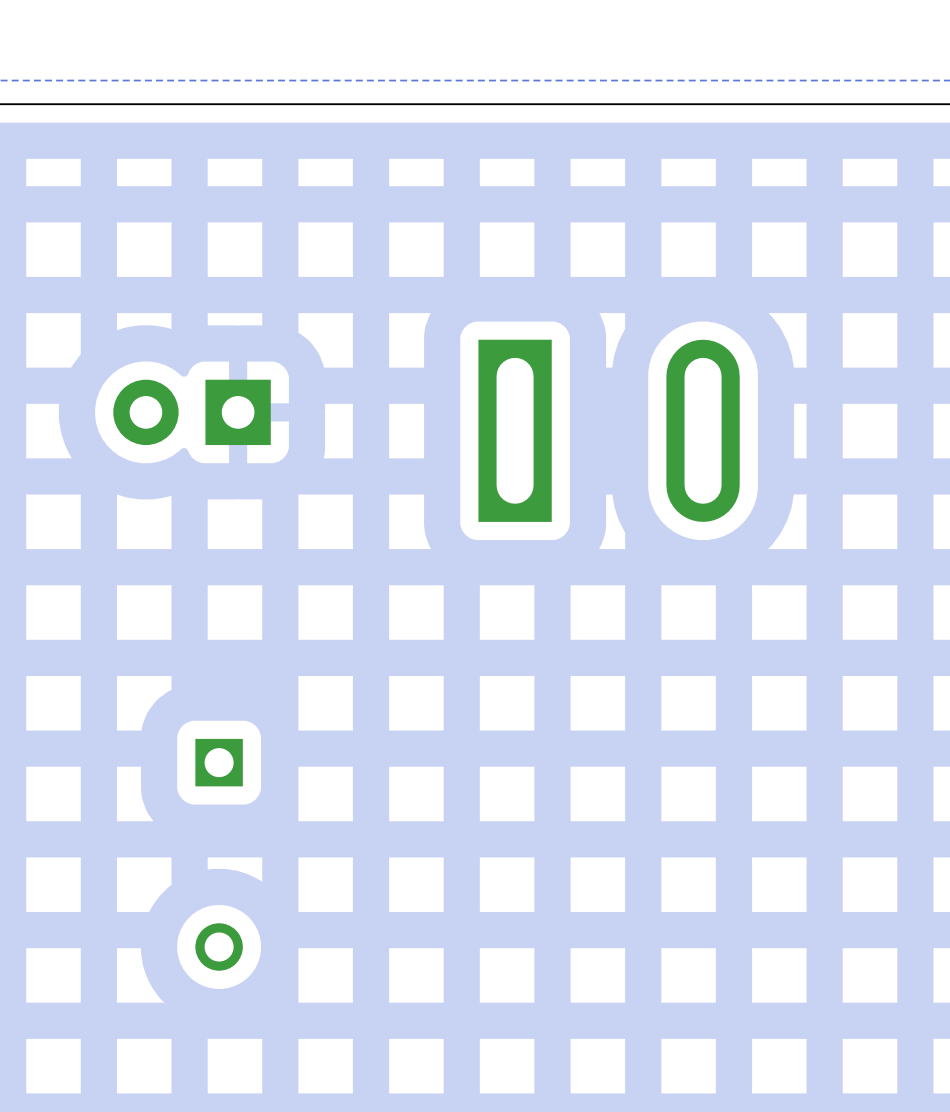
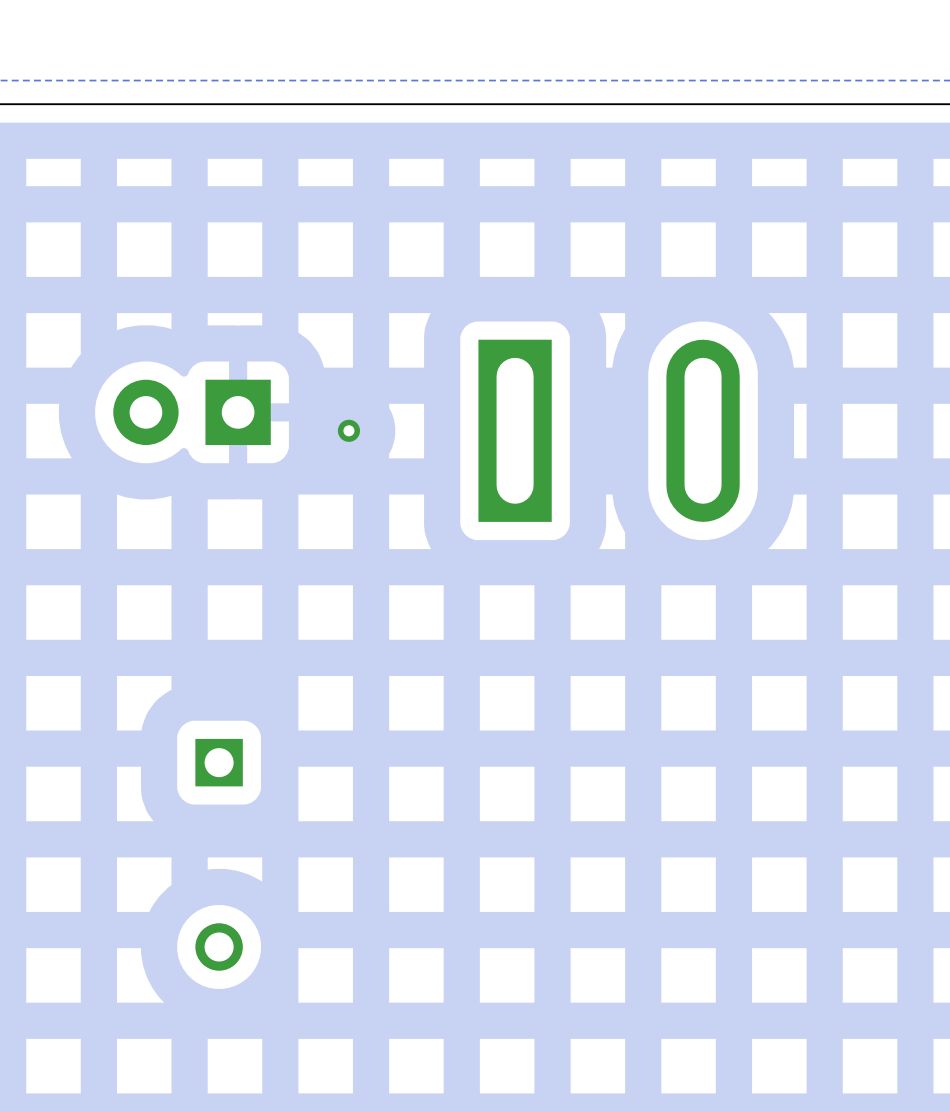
via: none -> (348, 430)

